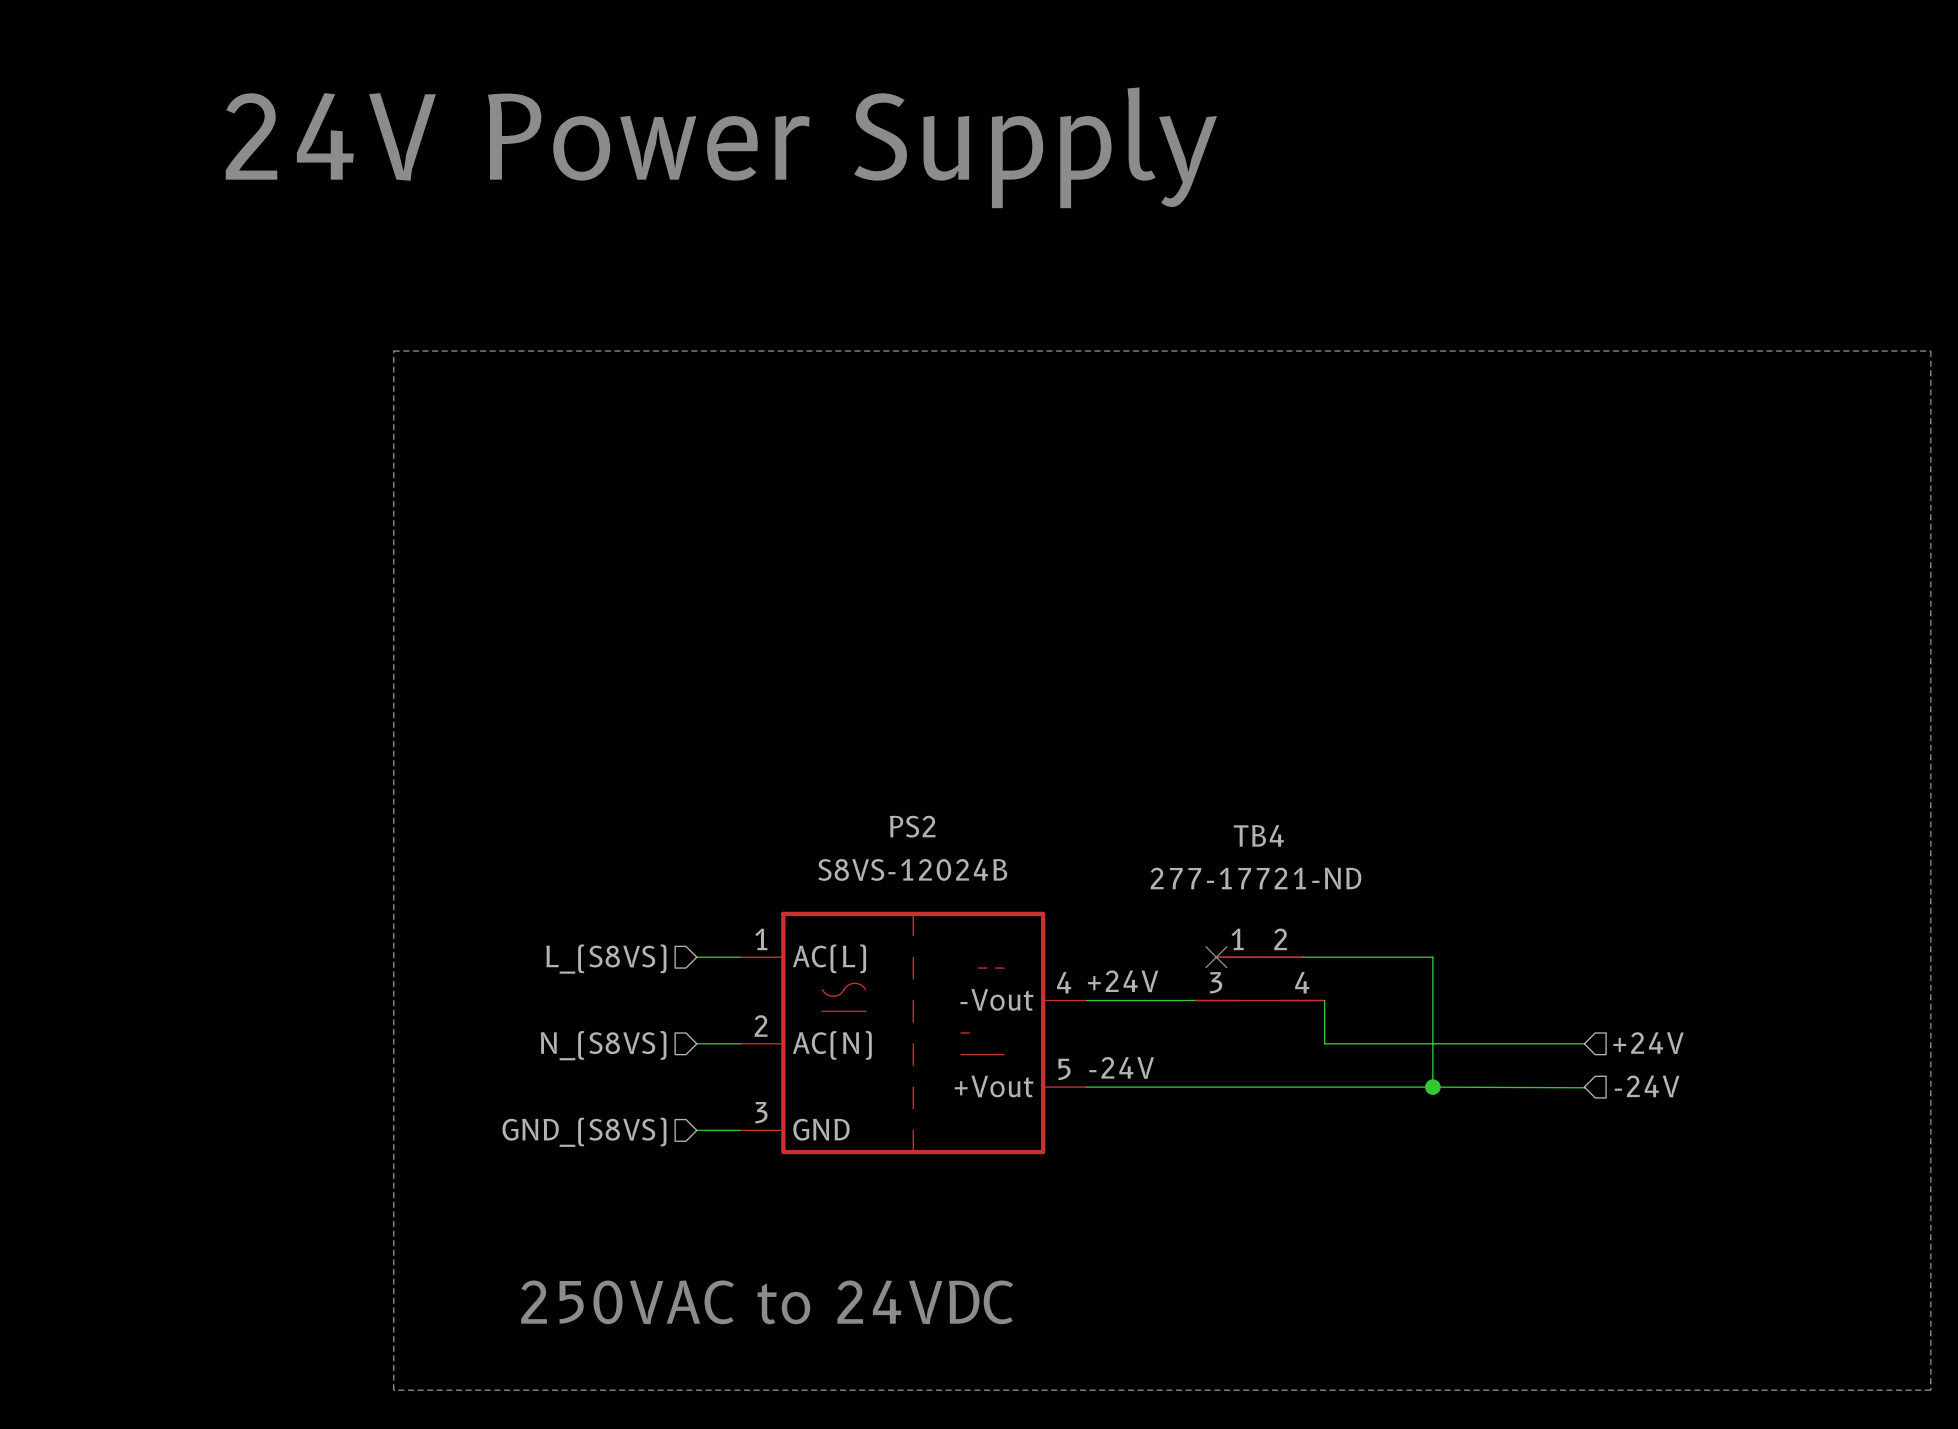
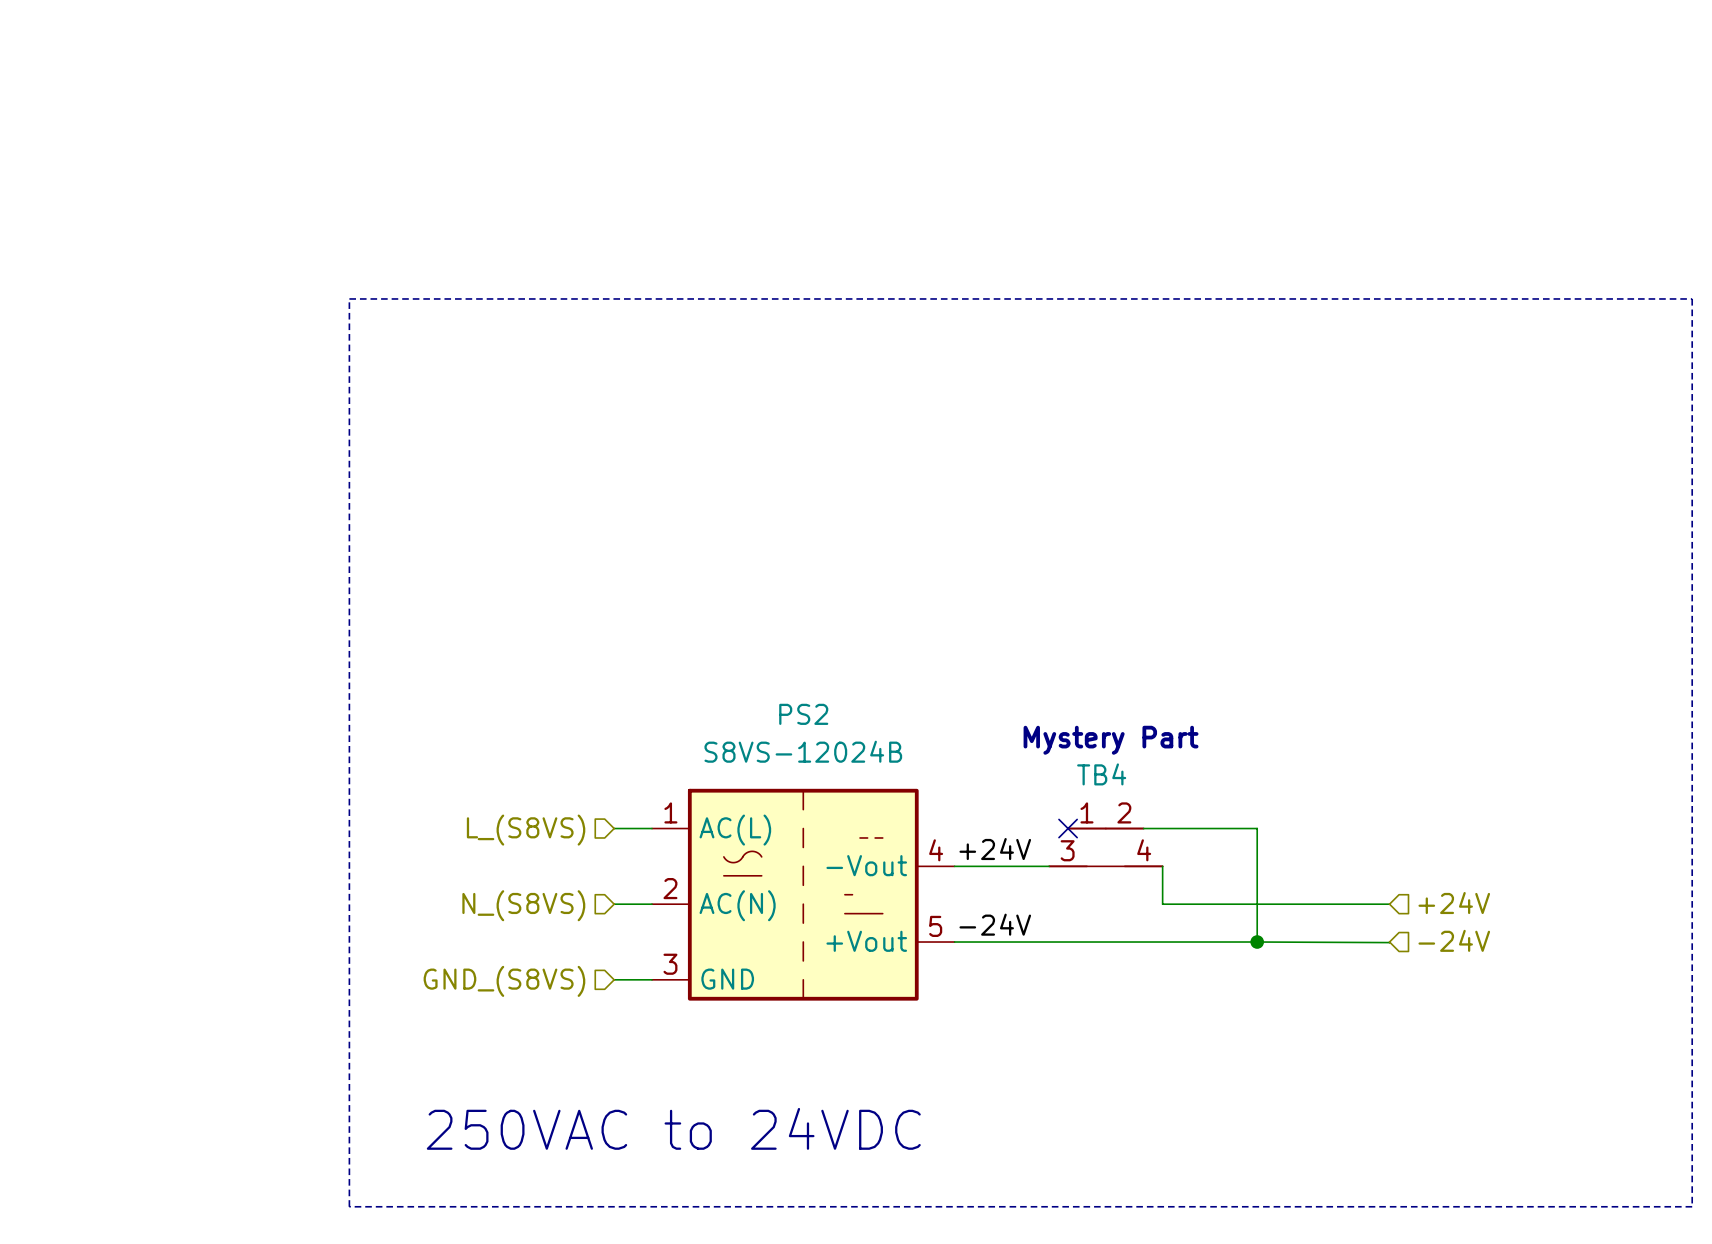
text: 24V Power Supply (721, 147) -> none
TB4 name position: TB4 (1258, 835) -> TB4 (1101, 774)
text: none -> Mystery Part (1111, 740)
TB4 value: 277-17721-ND (1256, 878) -> none

